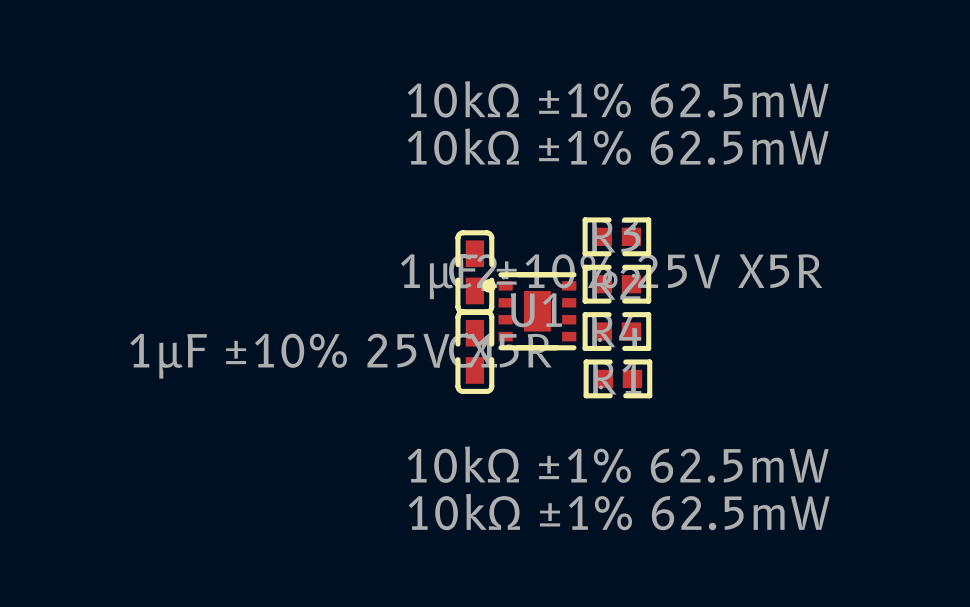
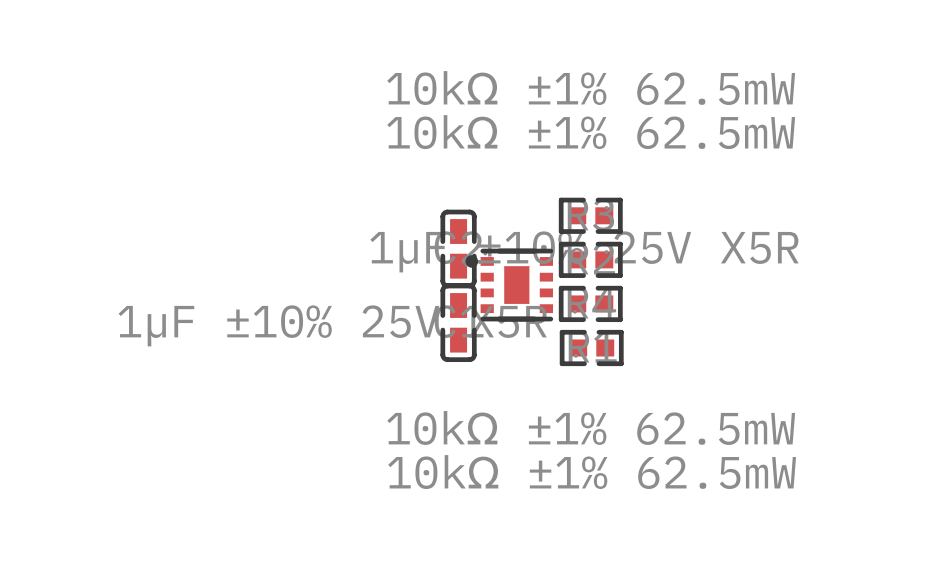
U1 name: U1 (536, 310) -> none

